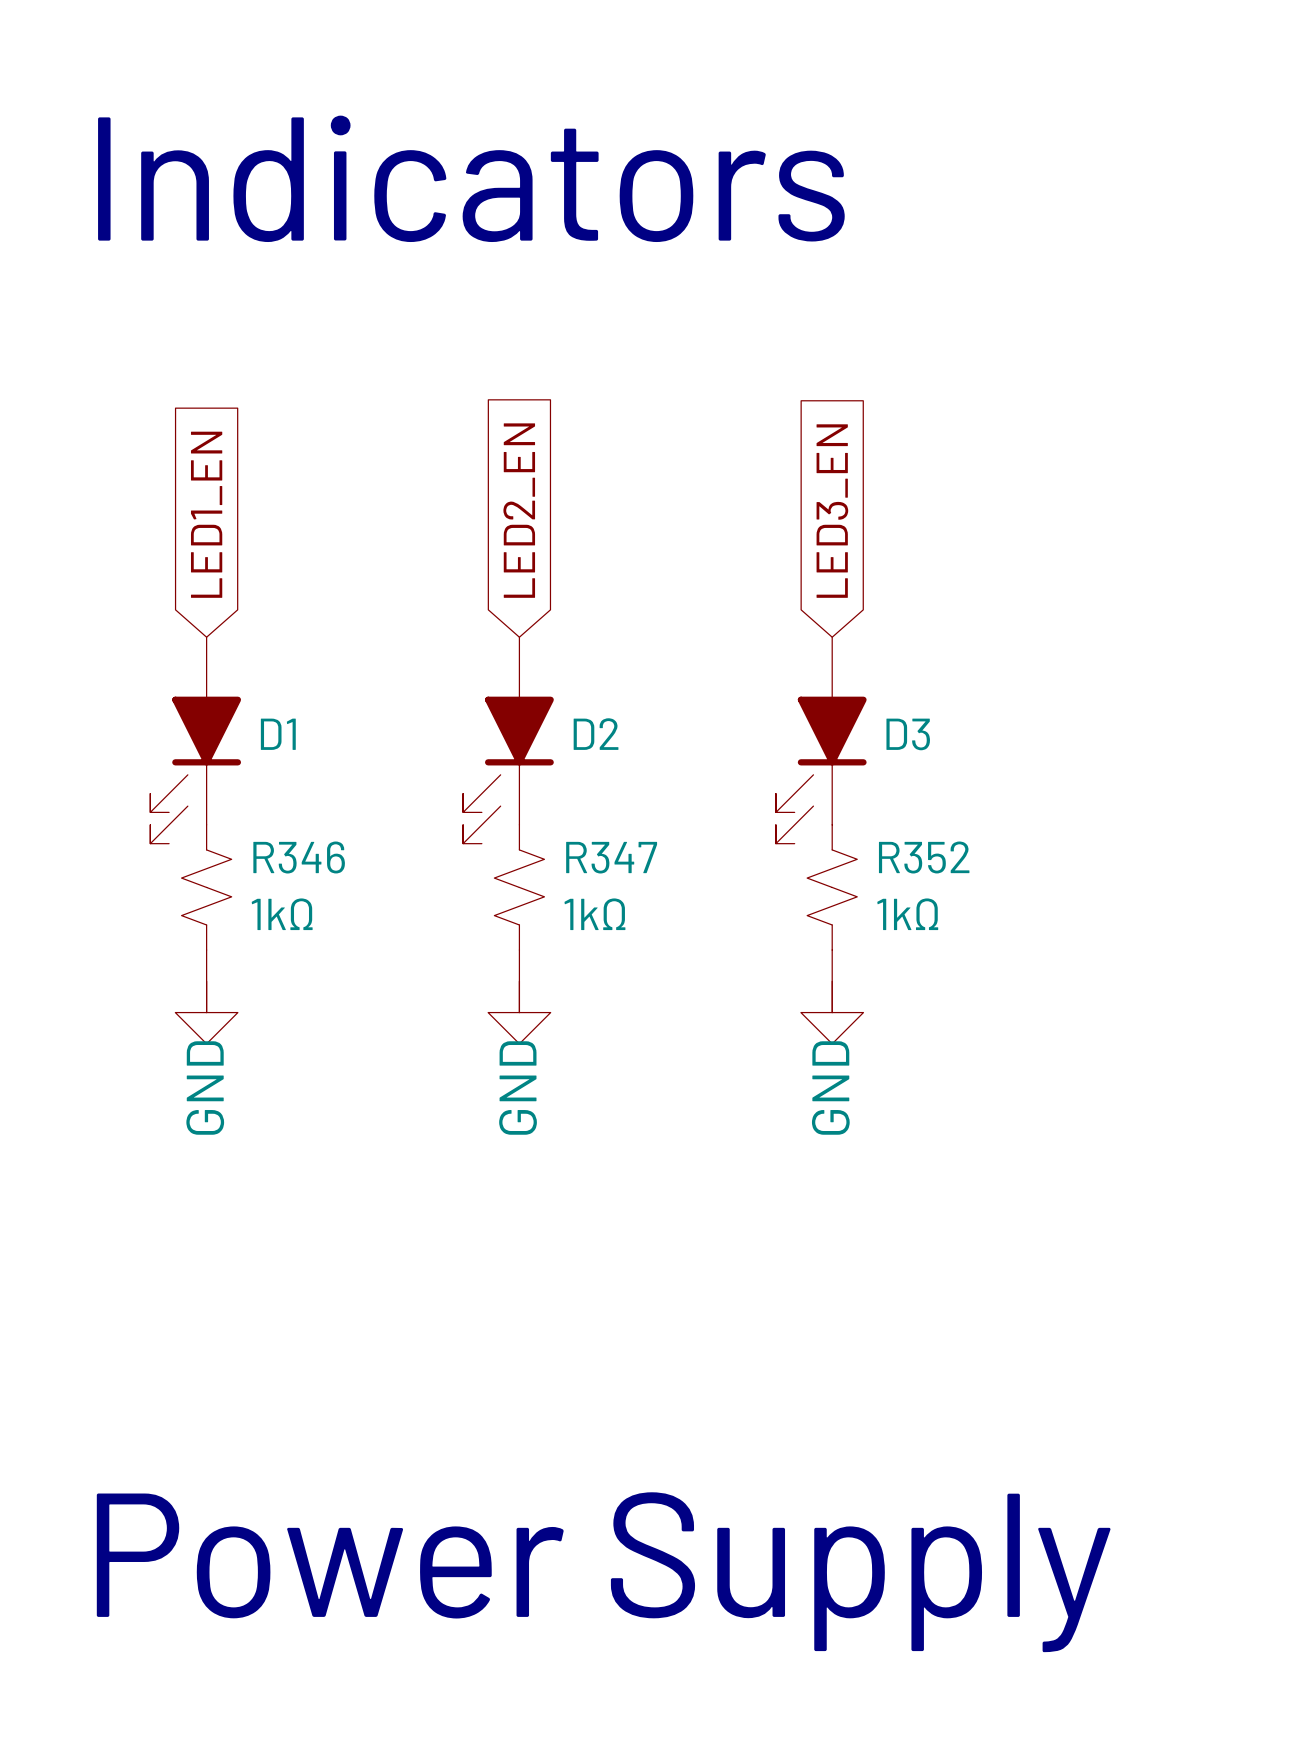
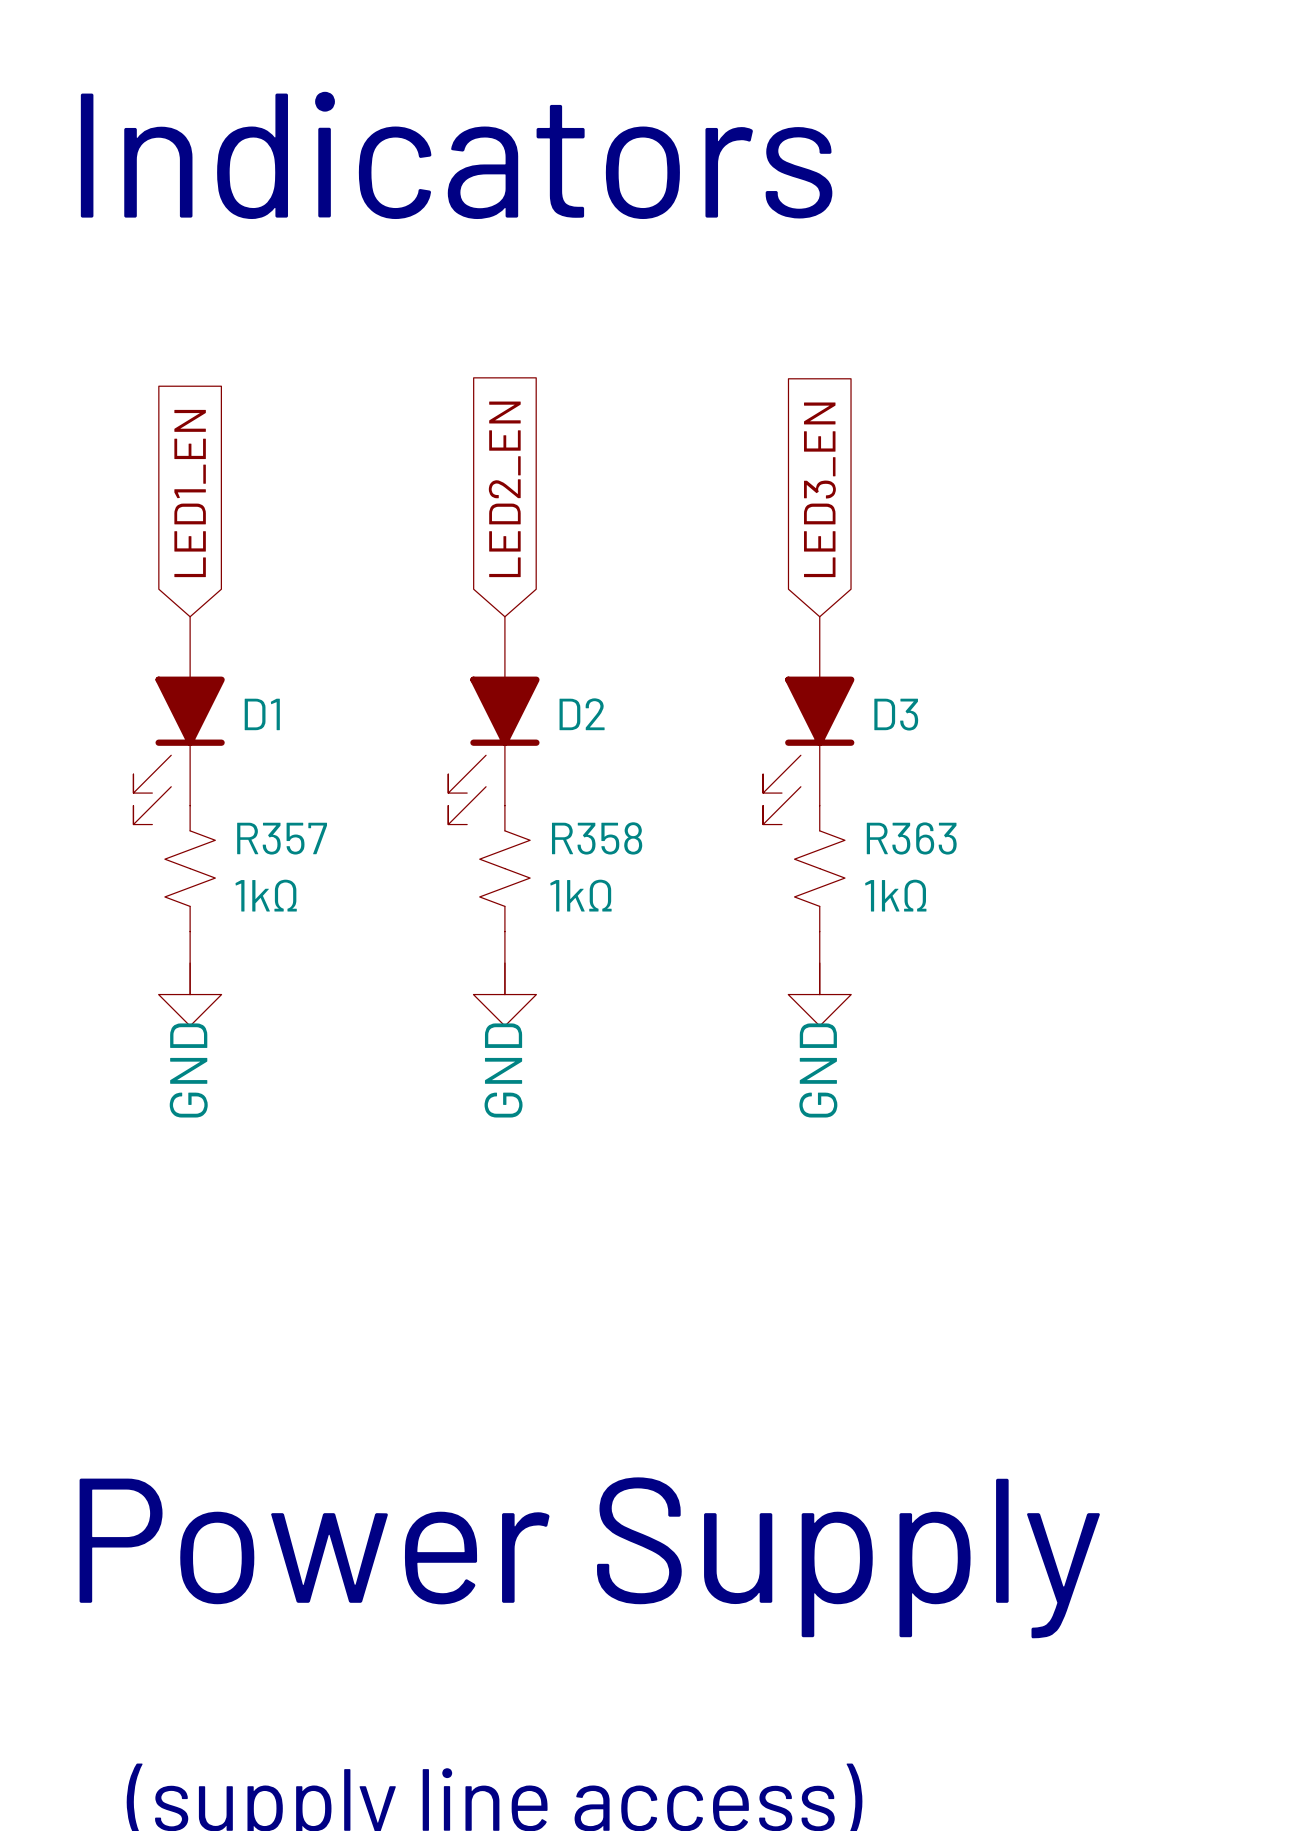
R346 name: R346 (299, 857) -> R357 (282, 838)
R347 name: R347 (611, 857) -> R358 (597, 838)
R352 name: R352 (924, 857) -> R363 (911, 838)

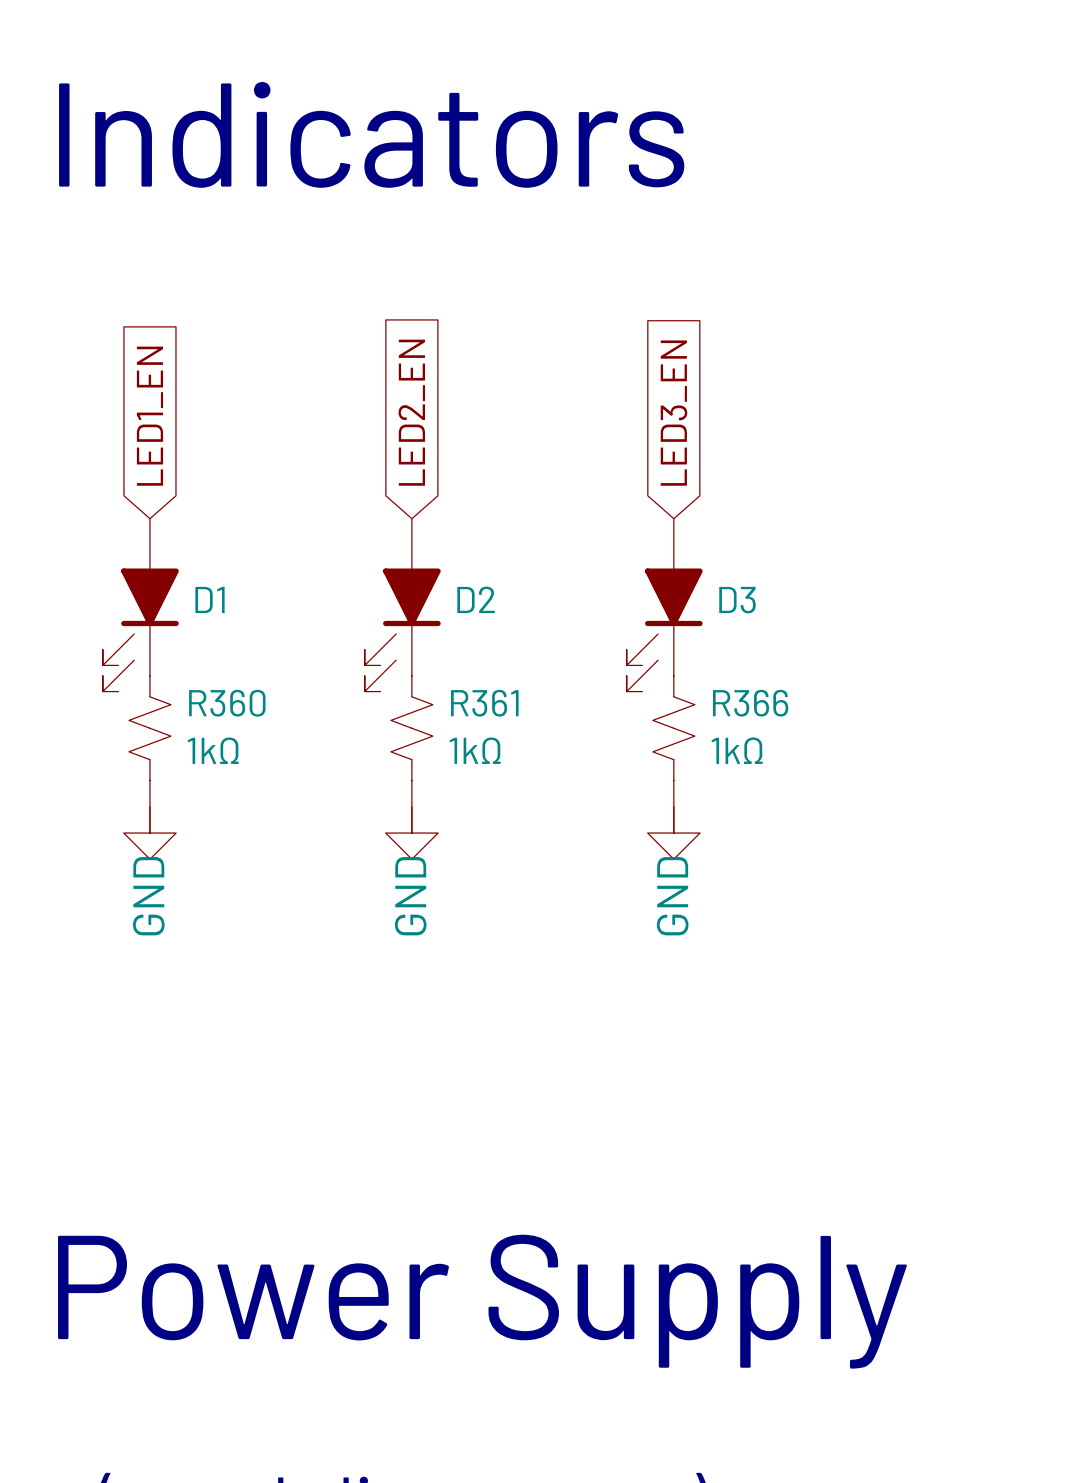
R357 name: R357 (282, 838) -> R360 (227, 703)
R358 name: R358 (597, 838) -> R361 (484, 703)
R363 name: R363 (911, 838) -> R366 (750, 703)

